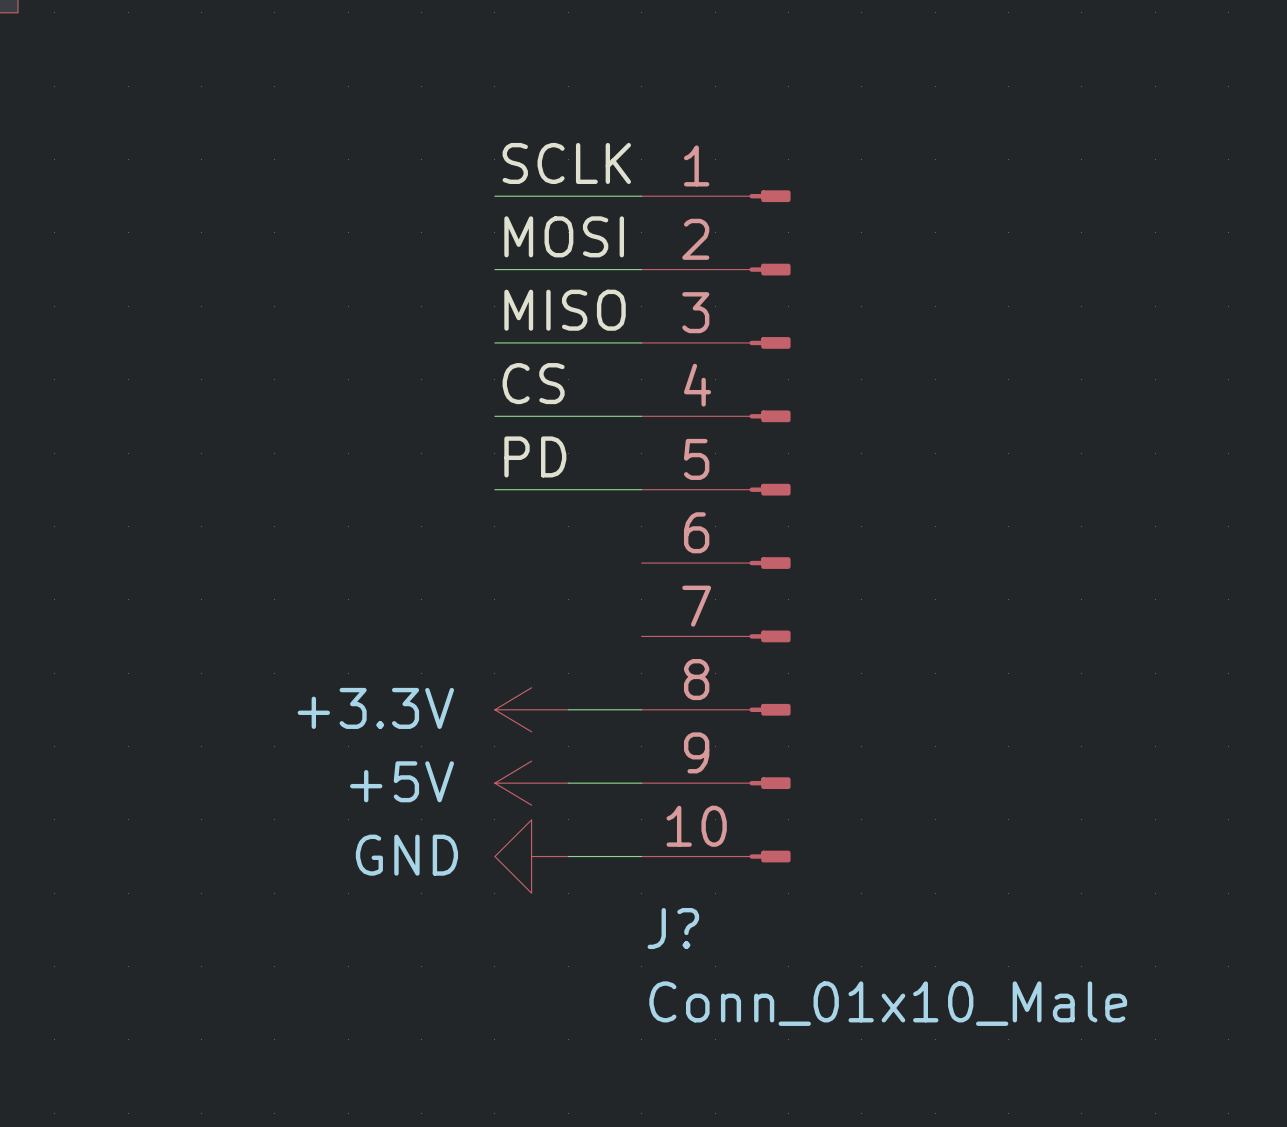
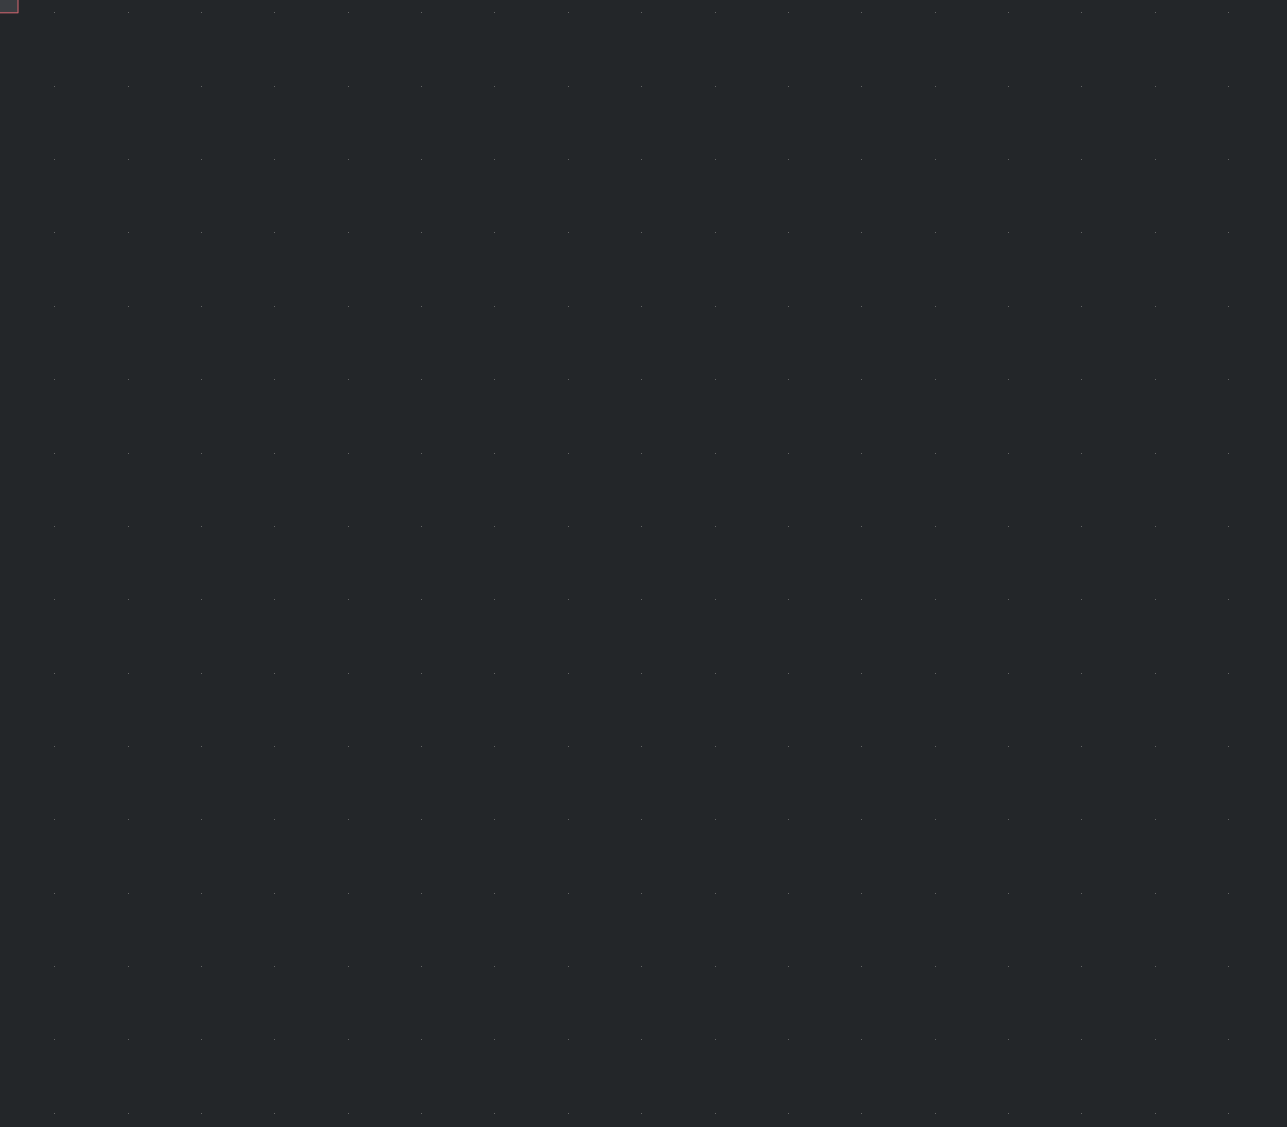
label: SCLK (566, 163) -> none
wire: (494, 196) (641, 196) -> none
label: MOSI (564, 236) -> none
wire: (494, 269) (641, 269) -> none
label: MISO (565, 310) -> none
wire: (494, 342) (641, 342) -> none
label: CS (533, 383) -> none
wire: (494, 416) (641, 416) -> none
label: PD (535, 456) -> none
wire: (494, 489) (641, 489) -> none
J?: Conn_01x10_Male (716, 526) -> none
power symbol: +3.3V (531, 709) -> none
wire: (568, 709) (641, 709) -> none
power symbol: +5V (531, 783) -> none
wire: (568, 783) (641, 783) -> none
power symbol: GND (531, 856) -> none
wire: (568, 856) (641, 856) -> none

